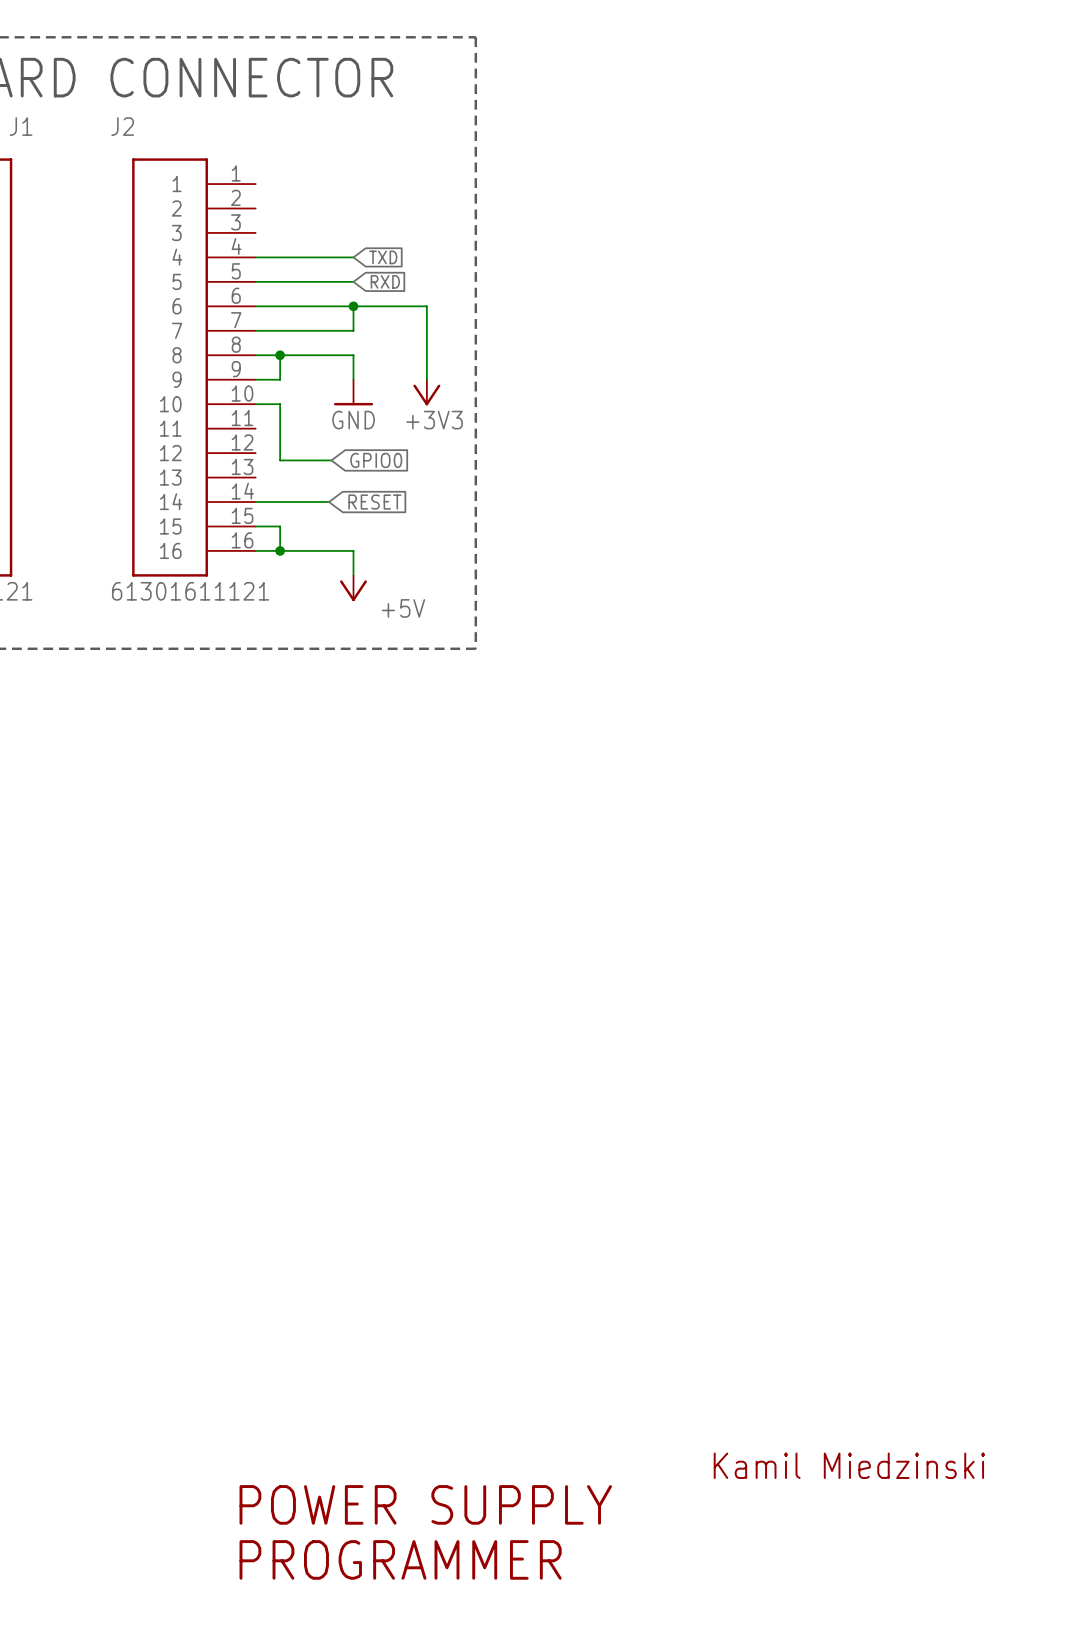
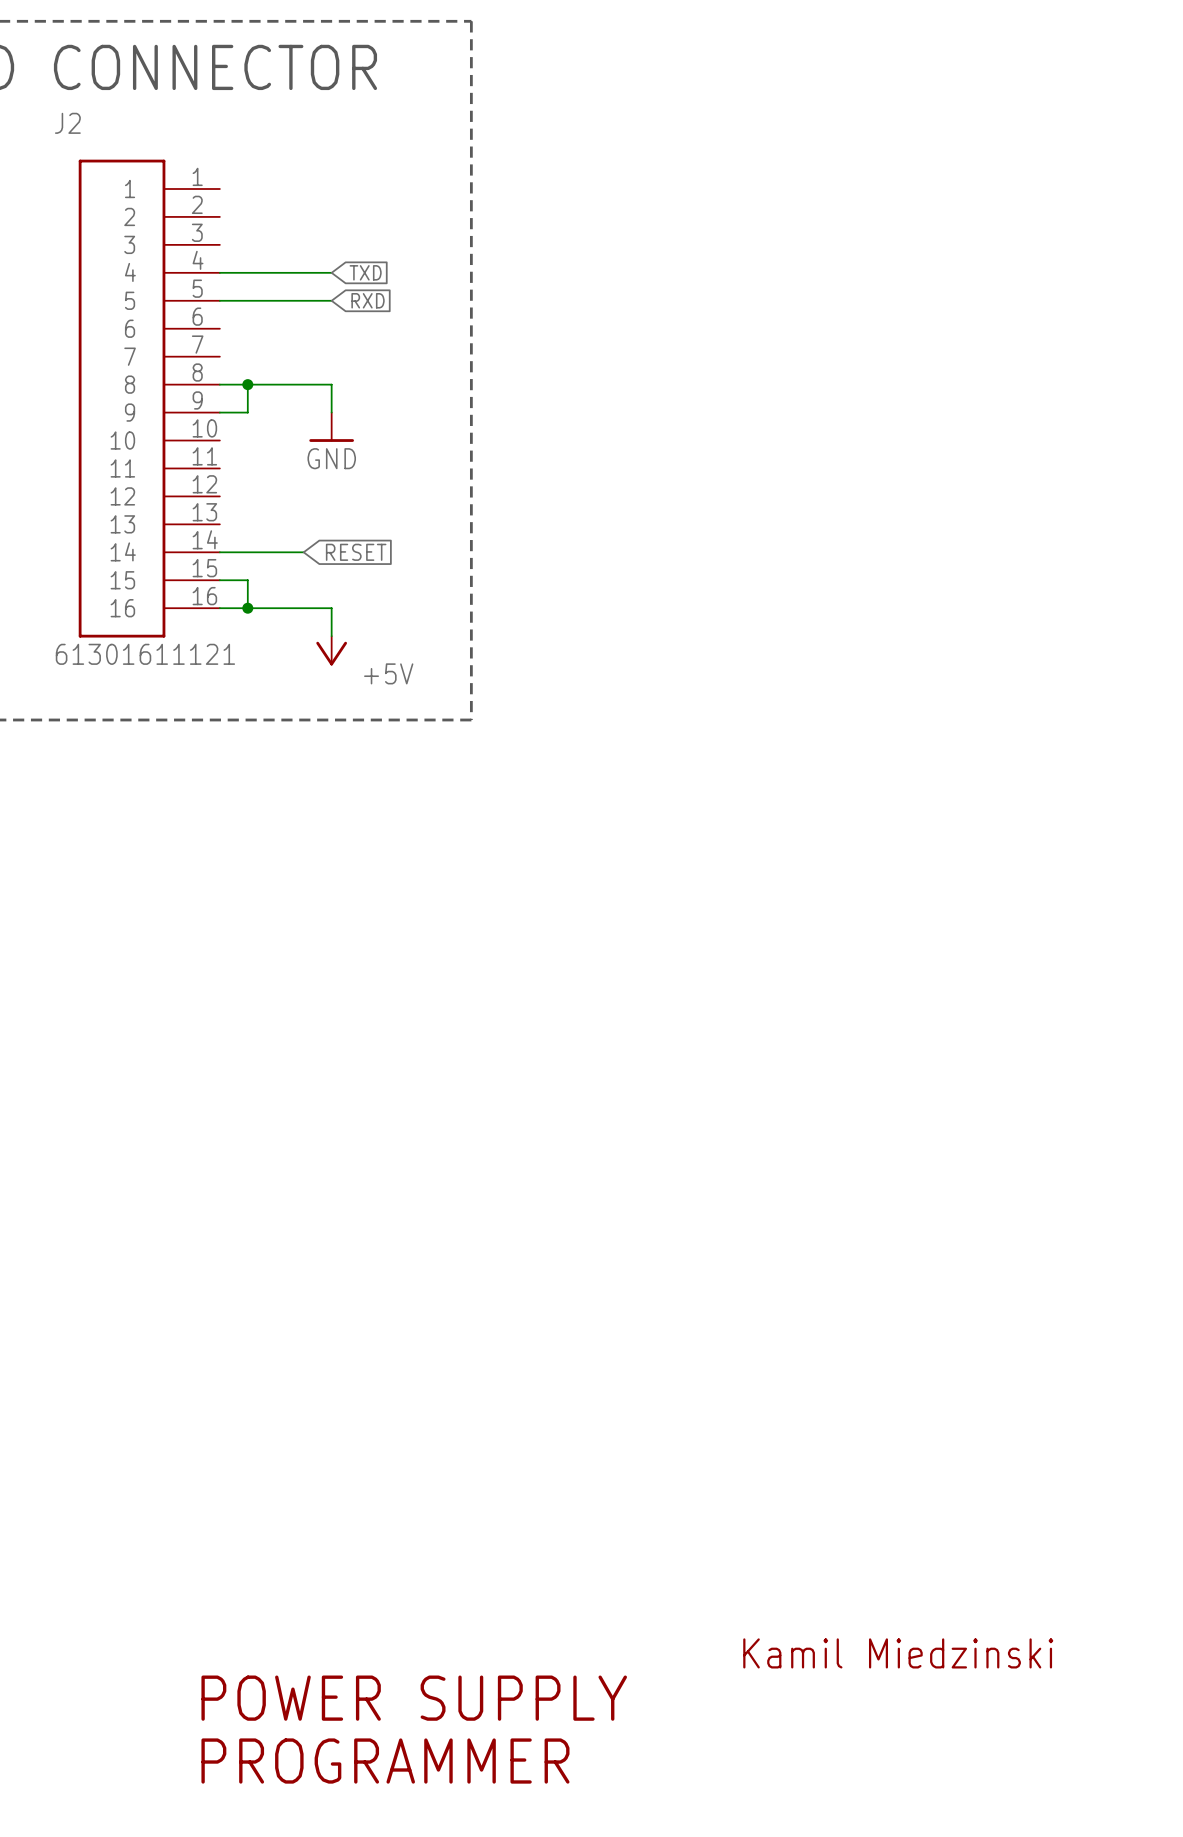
wire: (255, 306) (426, 306) (426, 379) -> none
wire: (353, 306) (353, 330) (255, 330) -> none
junction: (353, 306) -> none
power symbol: +3V3 (426, 392) -> none
wire: (255, 404) (280, 404) (280, 460) (331, 460) -> none
global label: GPIO0 (376, 460) -> none

